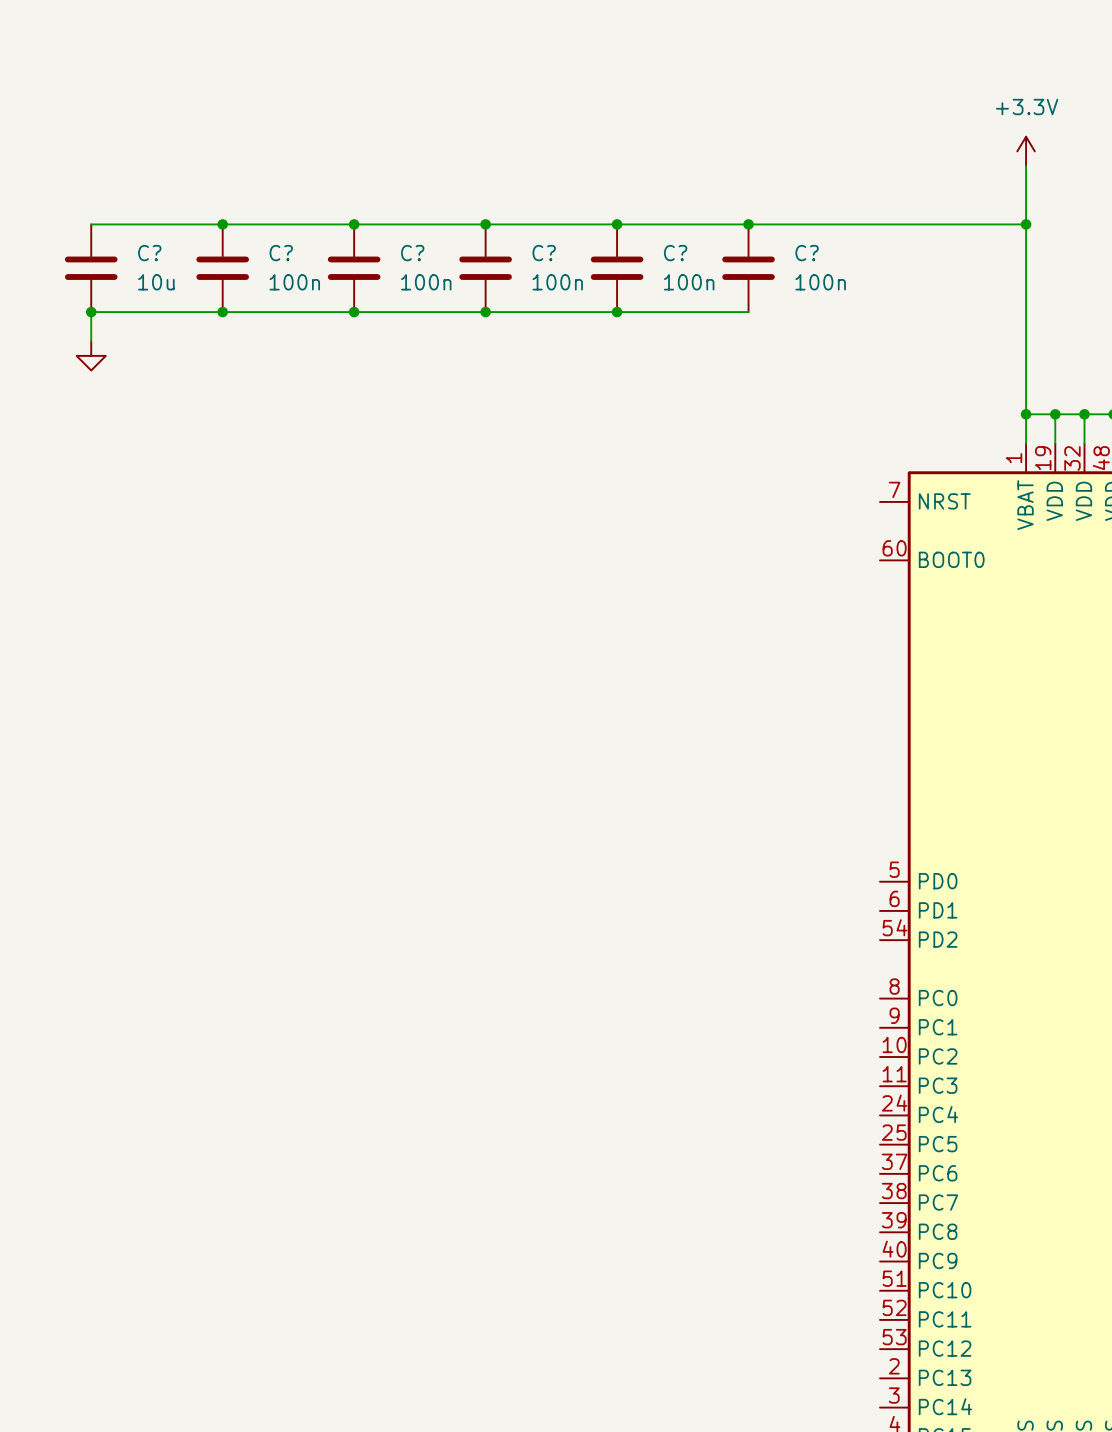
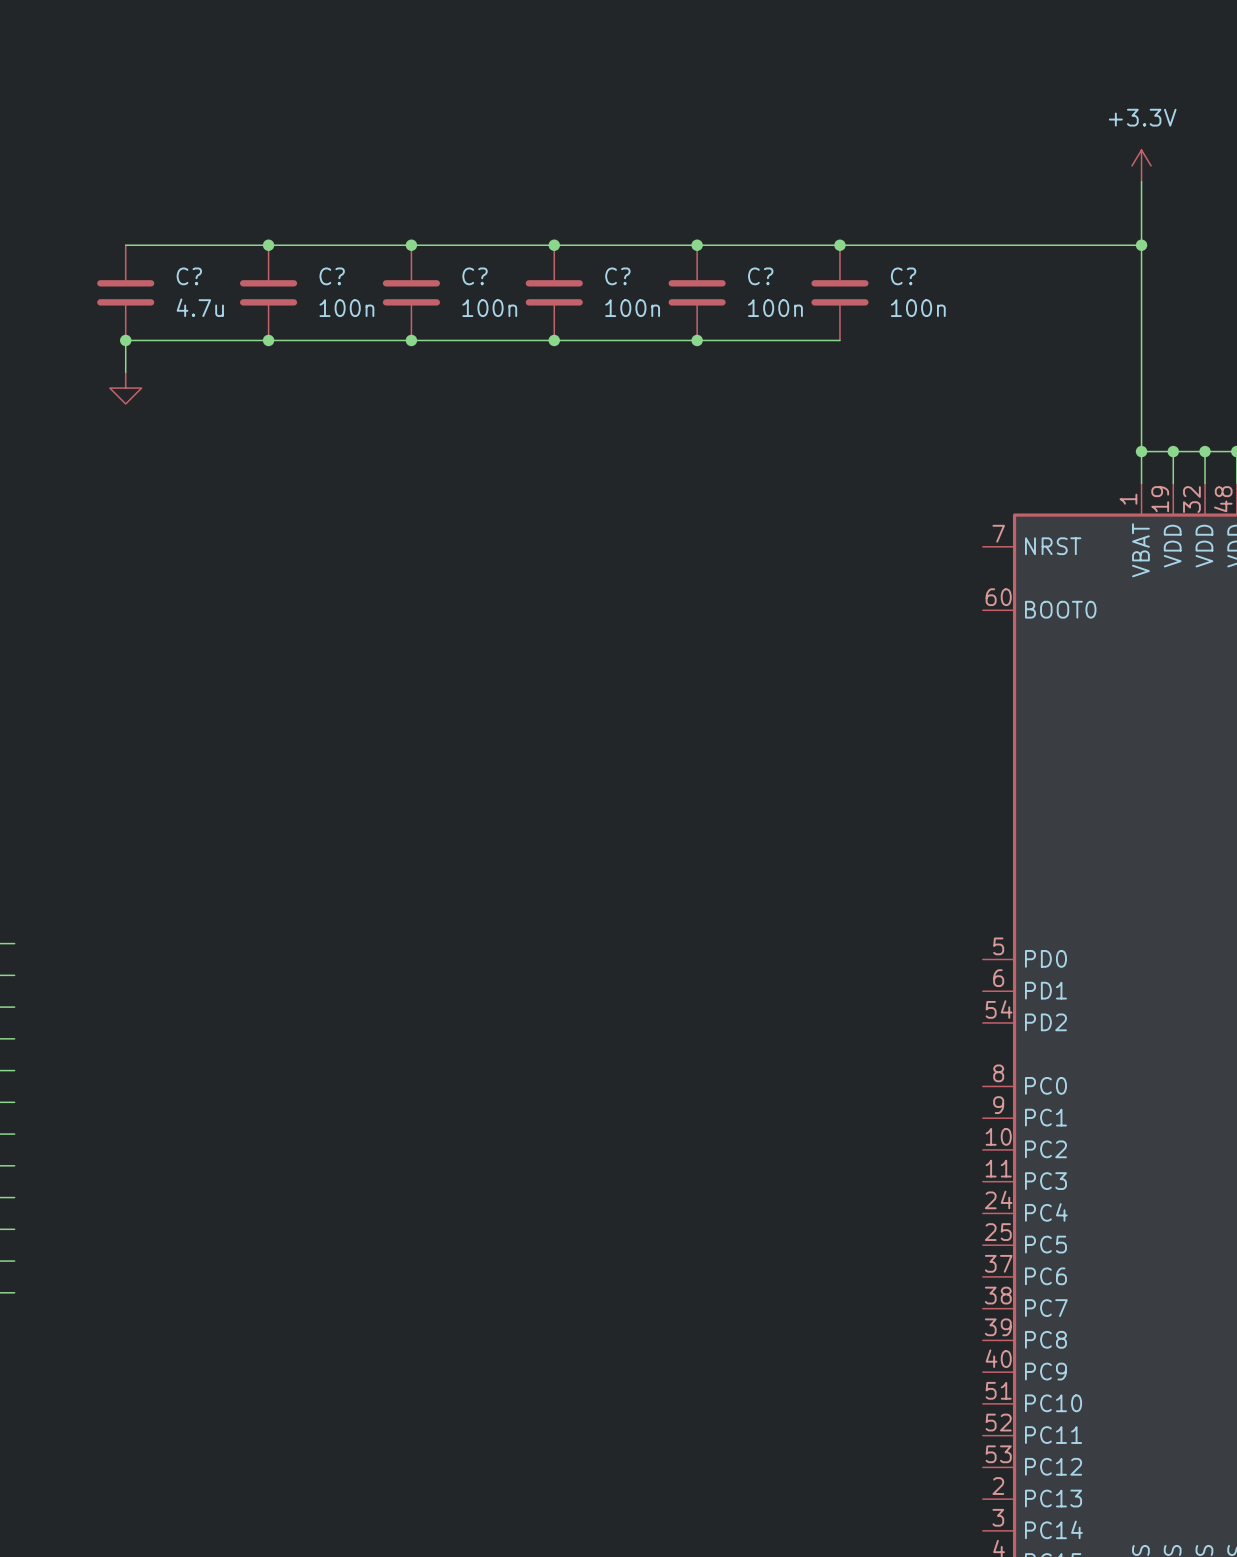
C? value: 10u (156, 282) -> 4.7u (200, 307)

